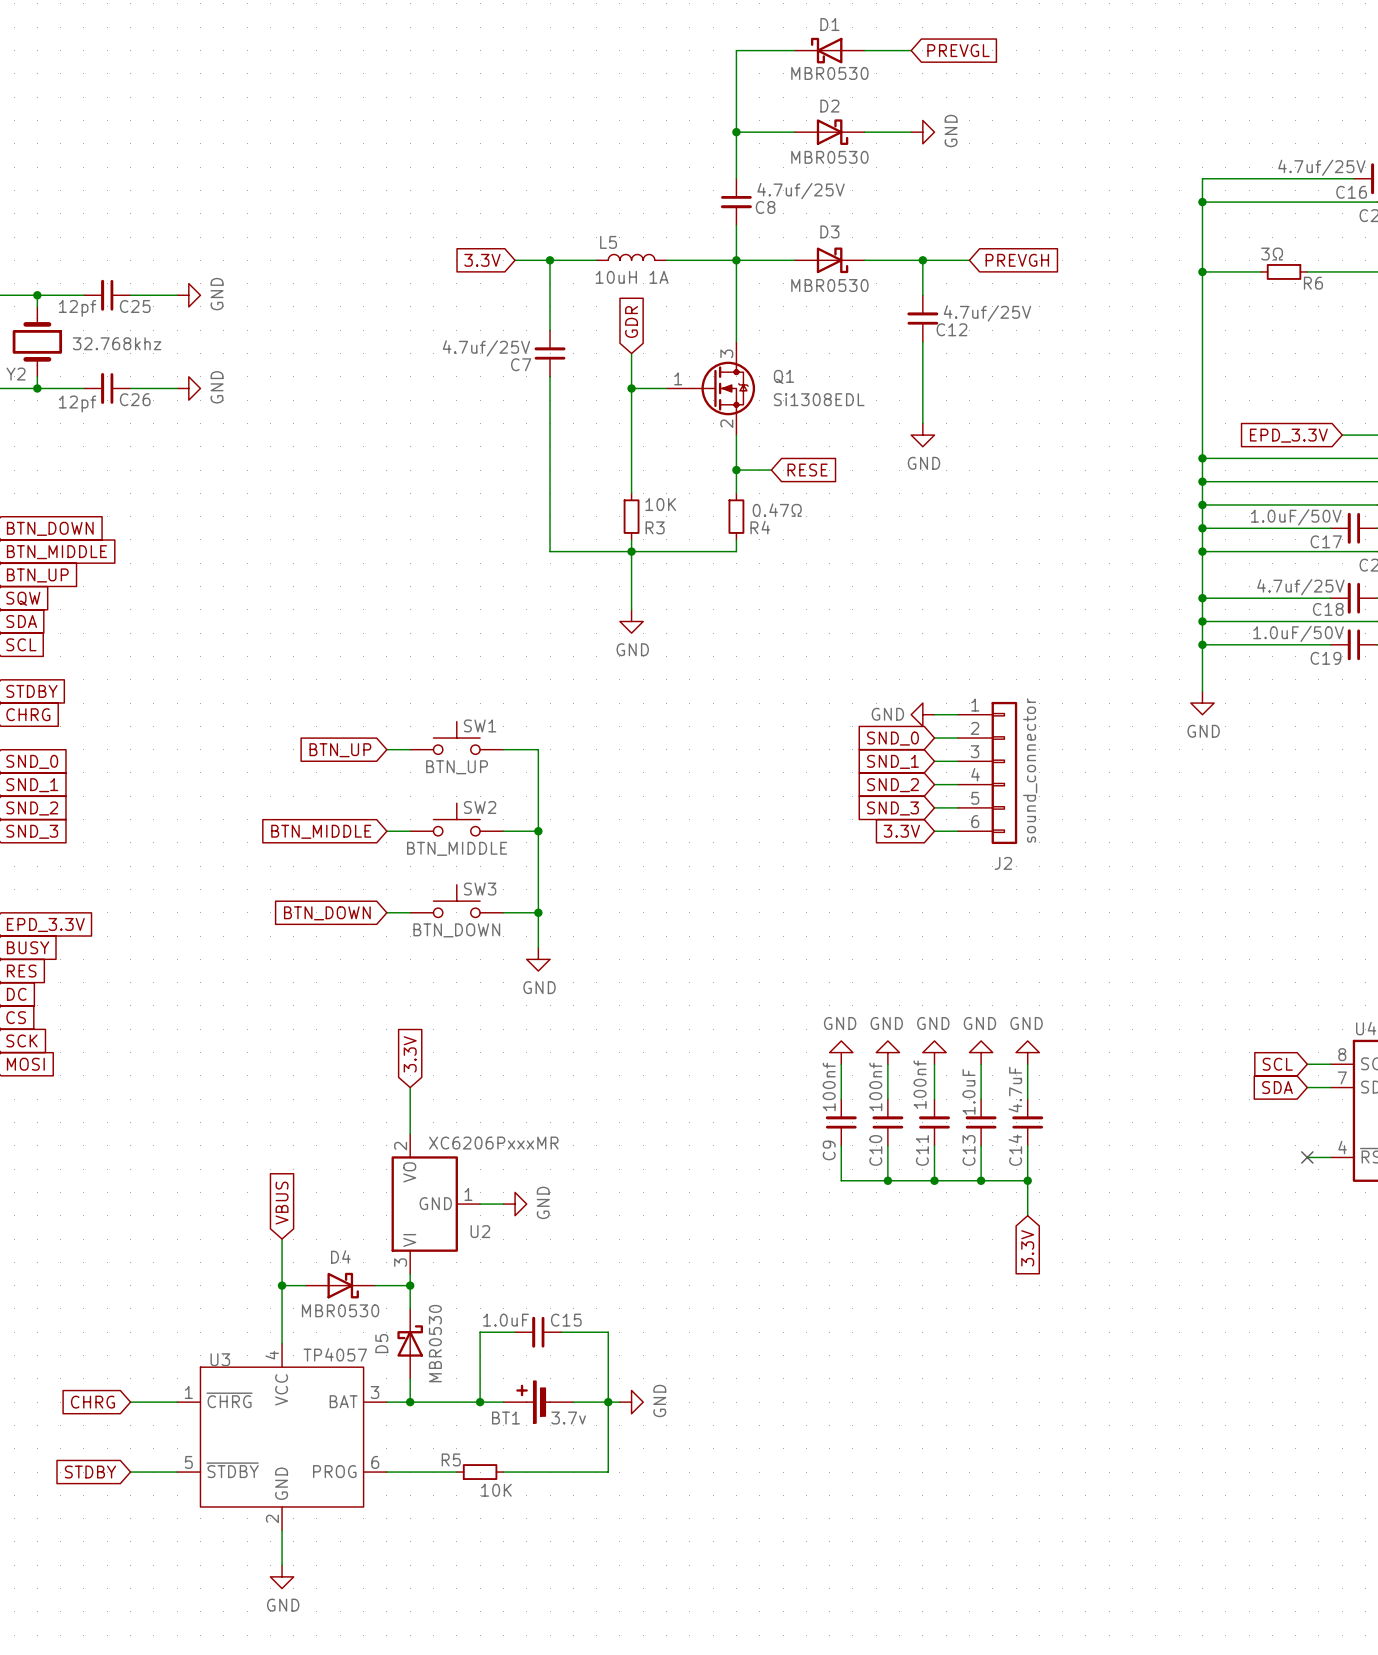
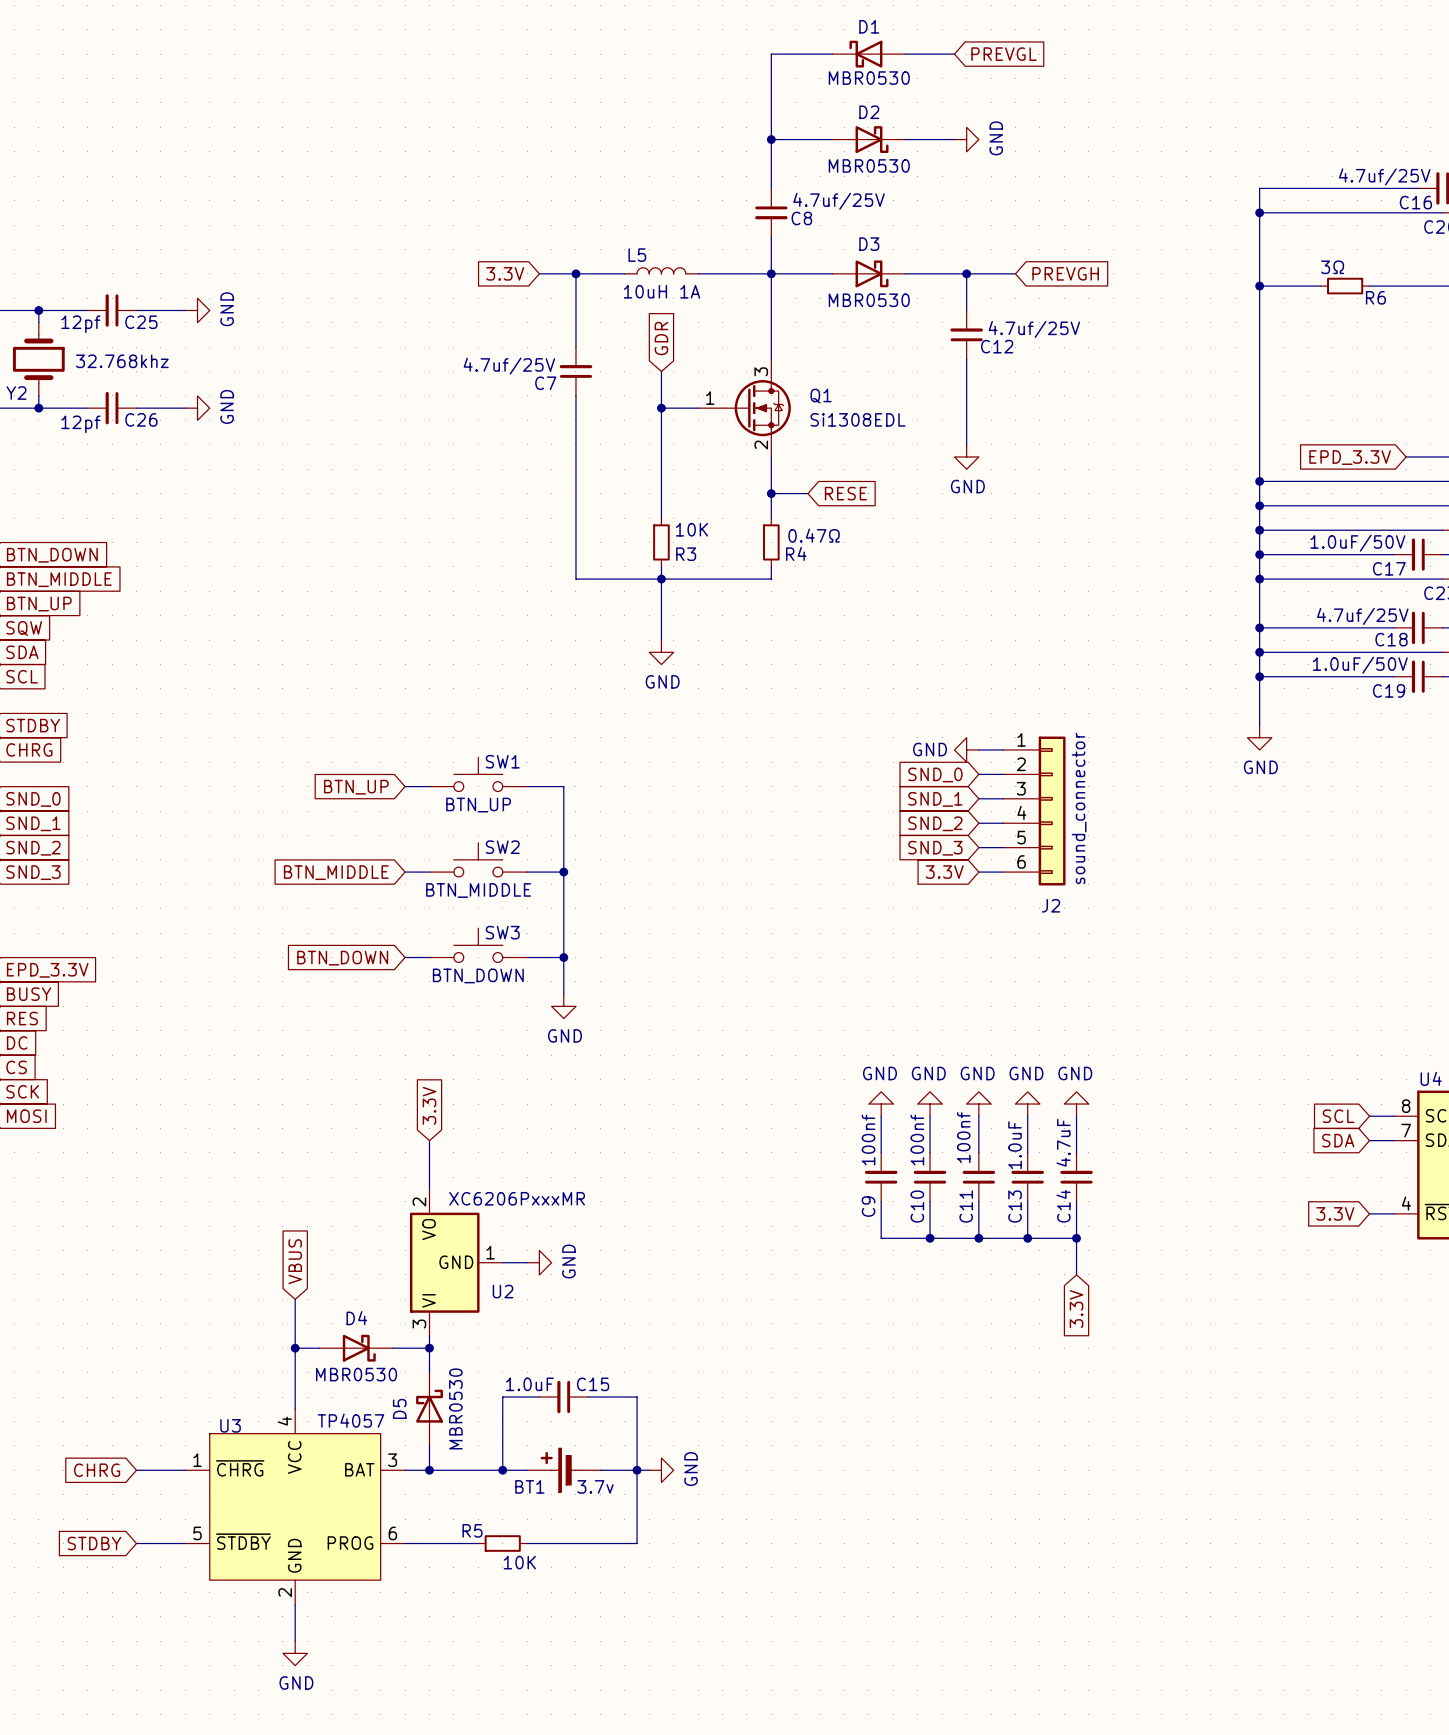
global label: none -> 3.3V (1335, 1213)
no-connect mark: (1307, 1157) -> none

